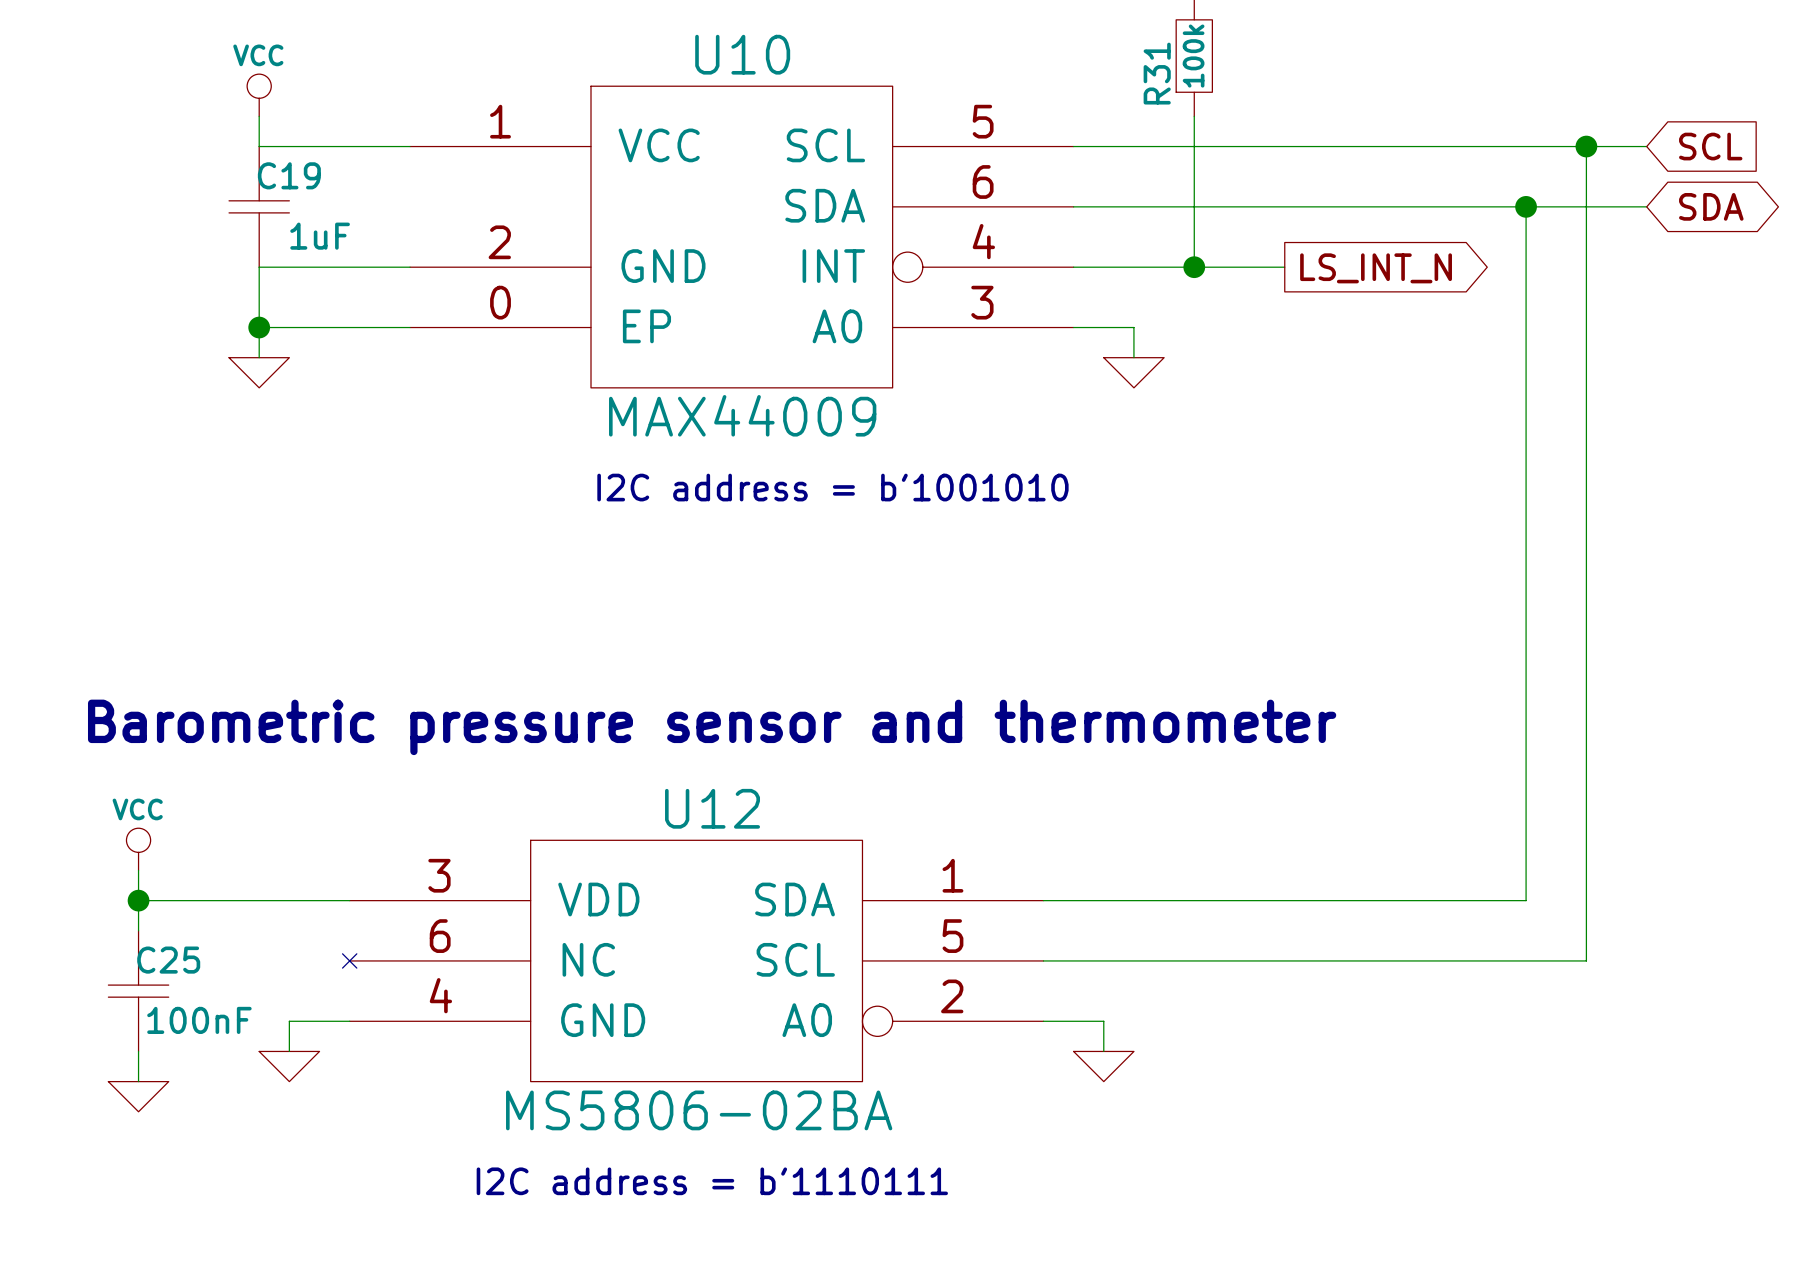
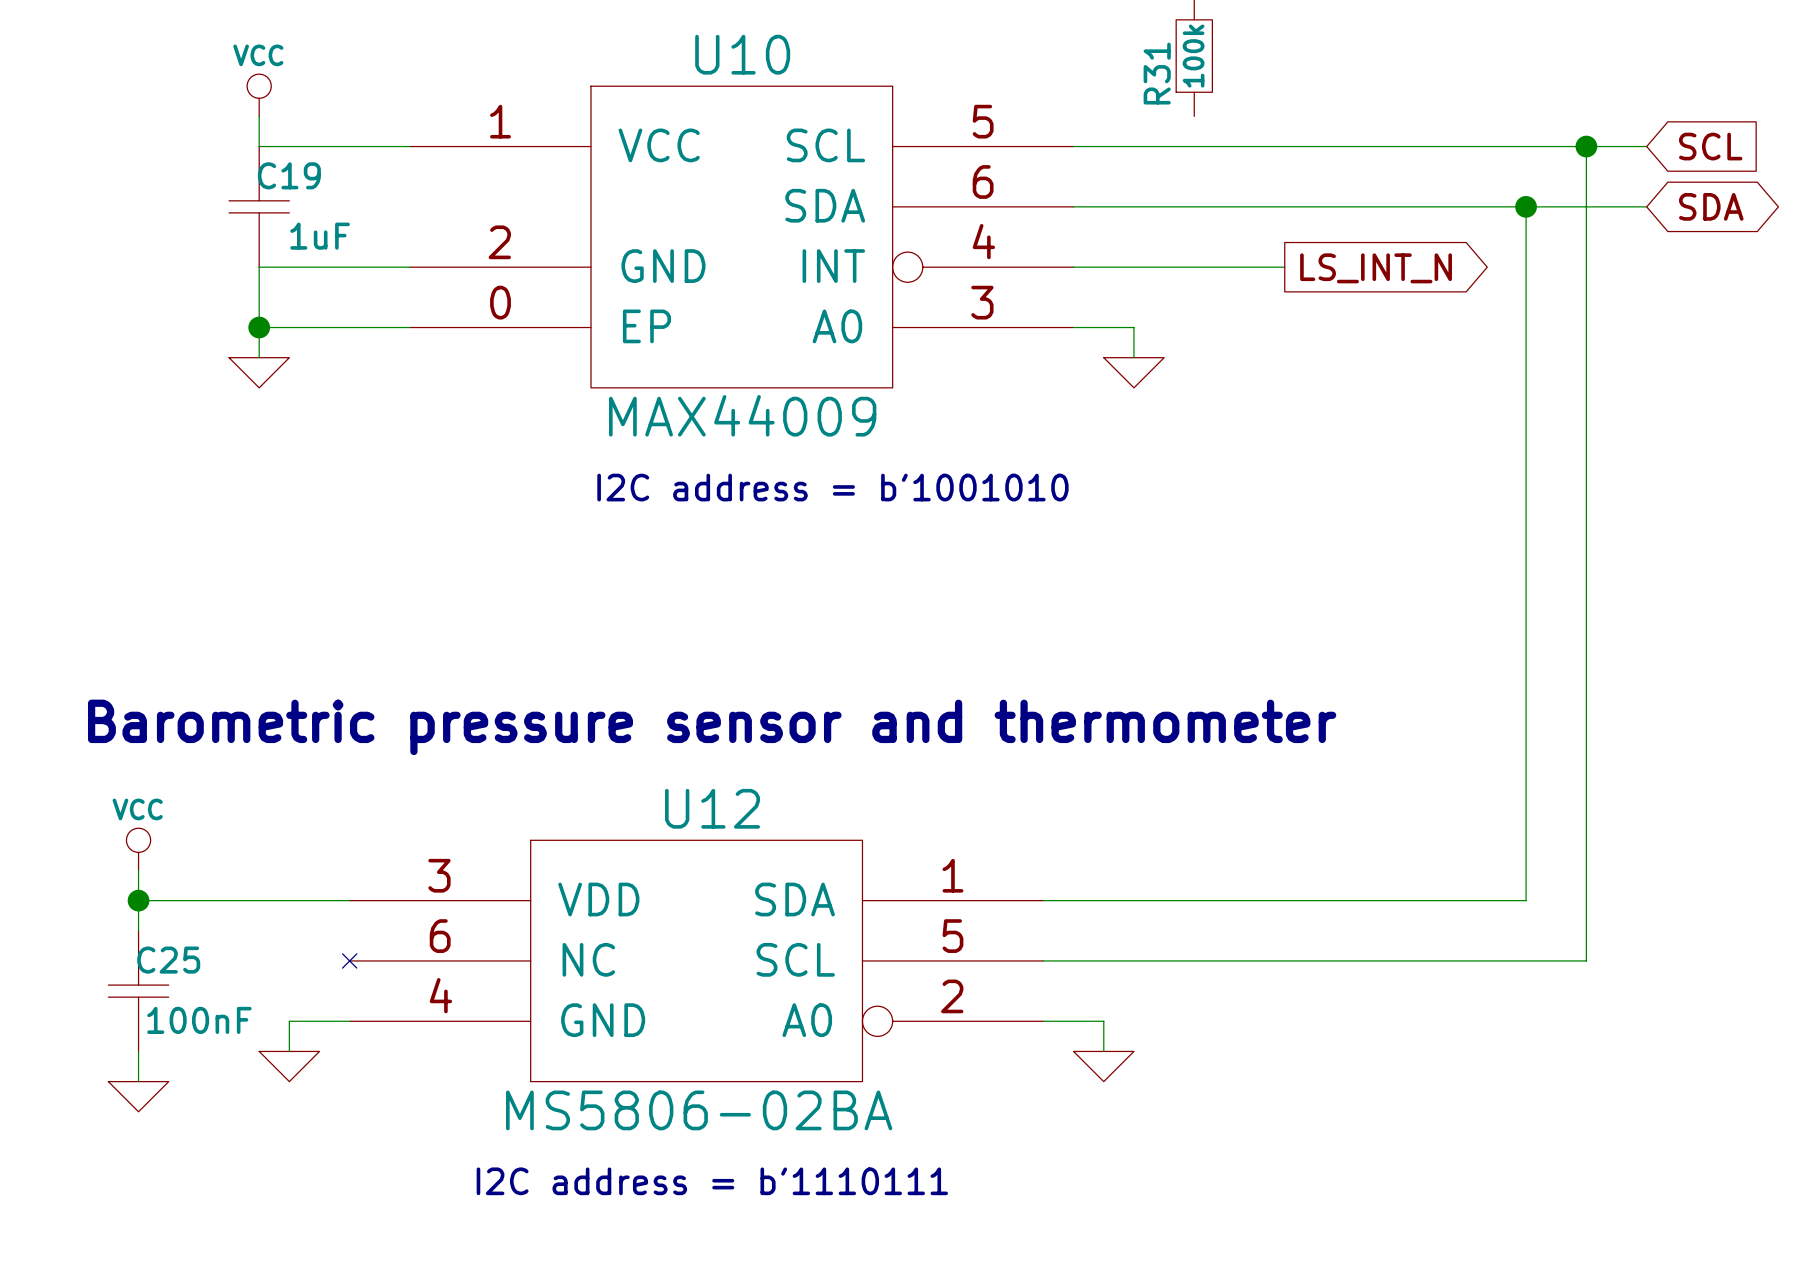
wire: (1194, 116) (1194, 267) -> none
junction: (1194, 267) -> none

